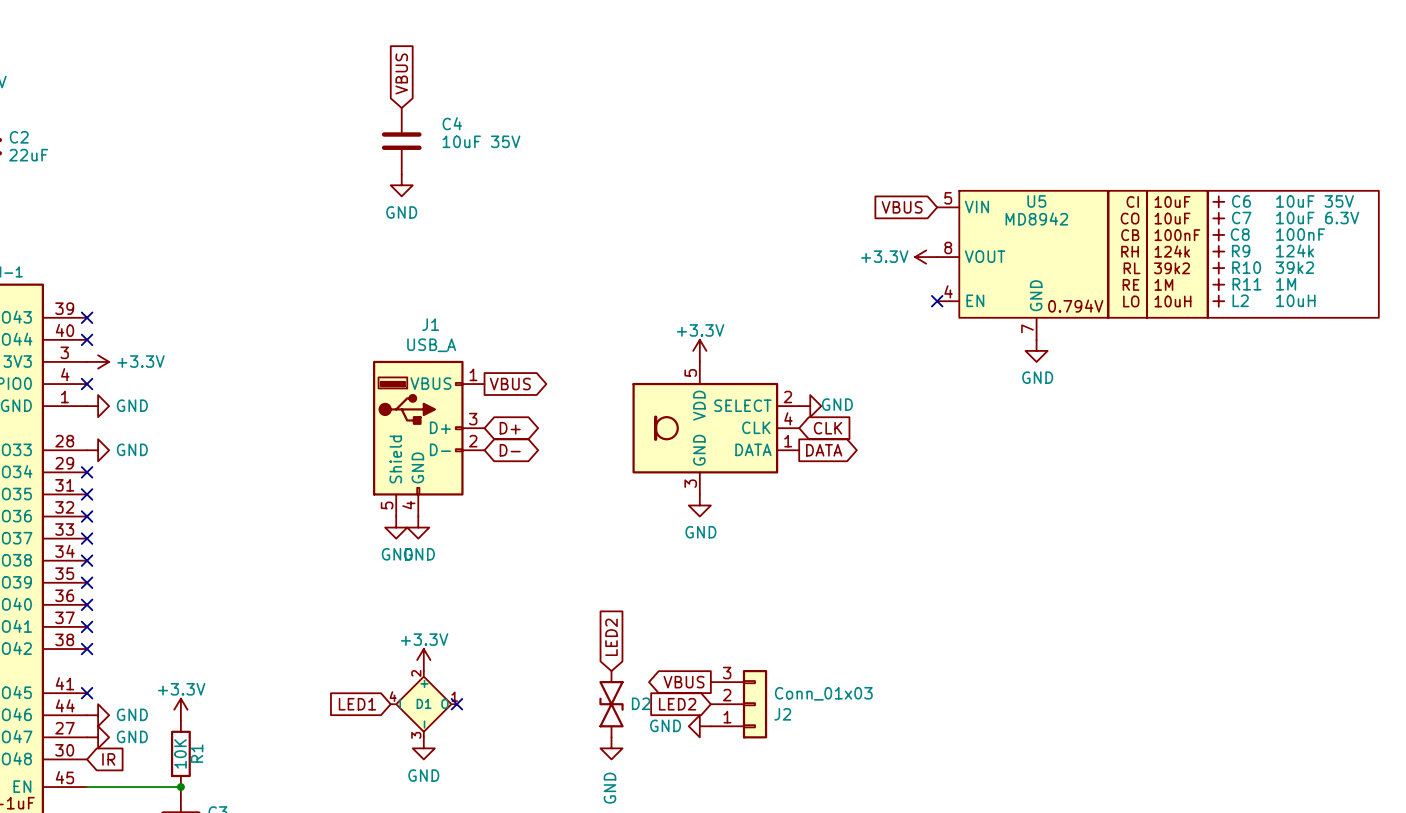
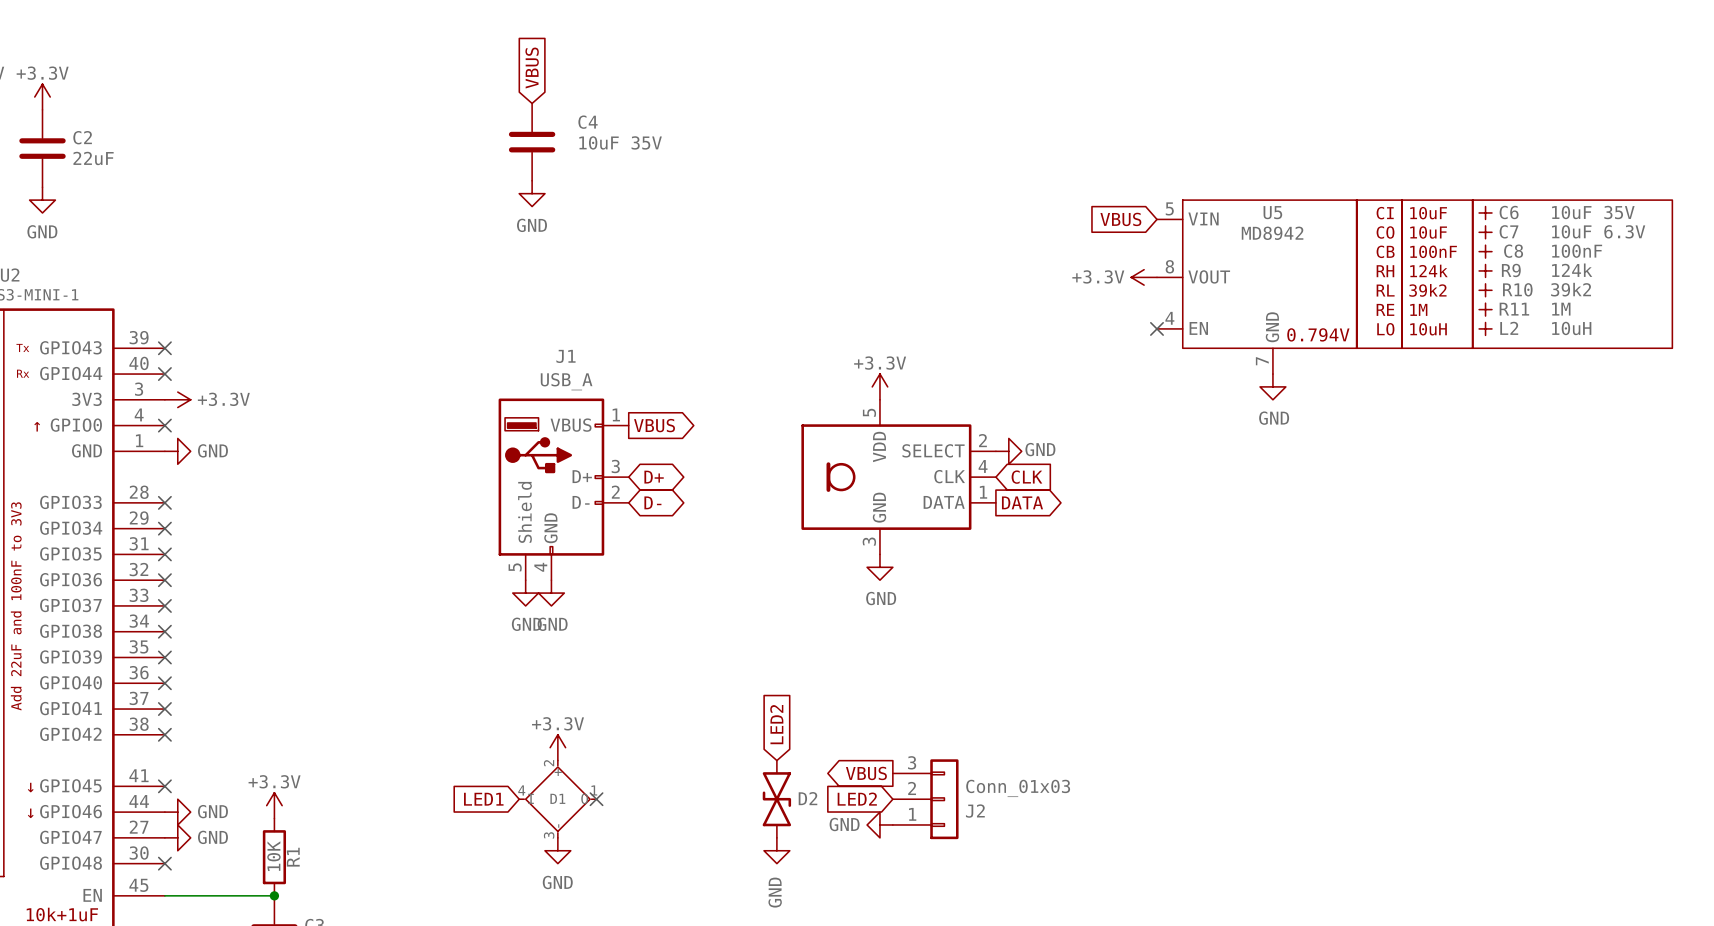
no-connect mark: none -> (164, 502)
power symbol: GND (98, 450) -> none
no-connect mark: none -> (164, 863)
global label: IR (108, 759) -> none

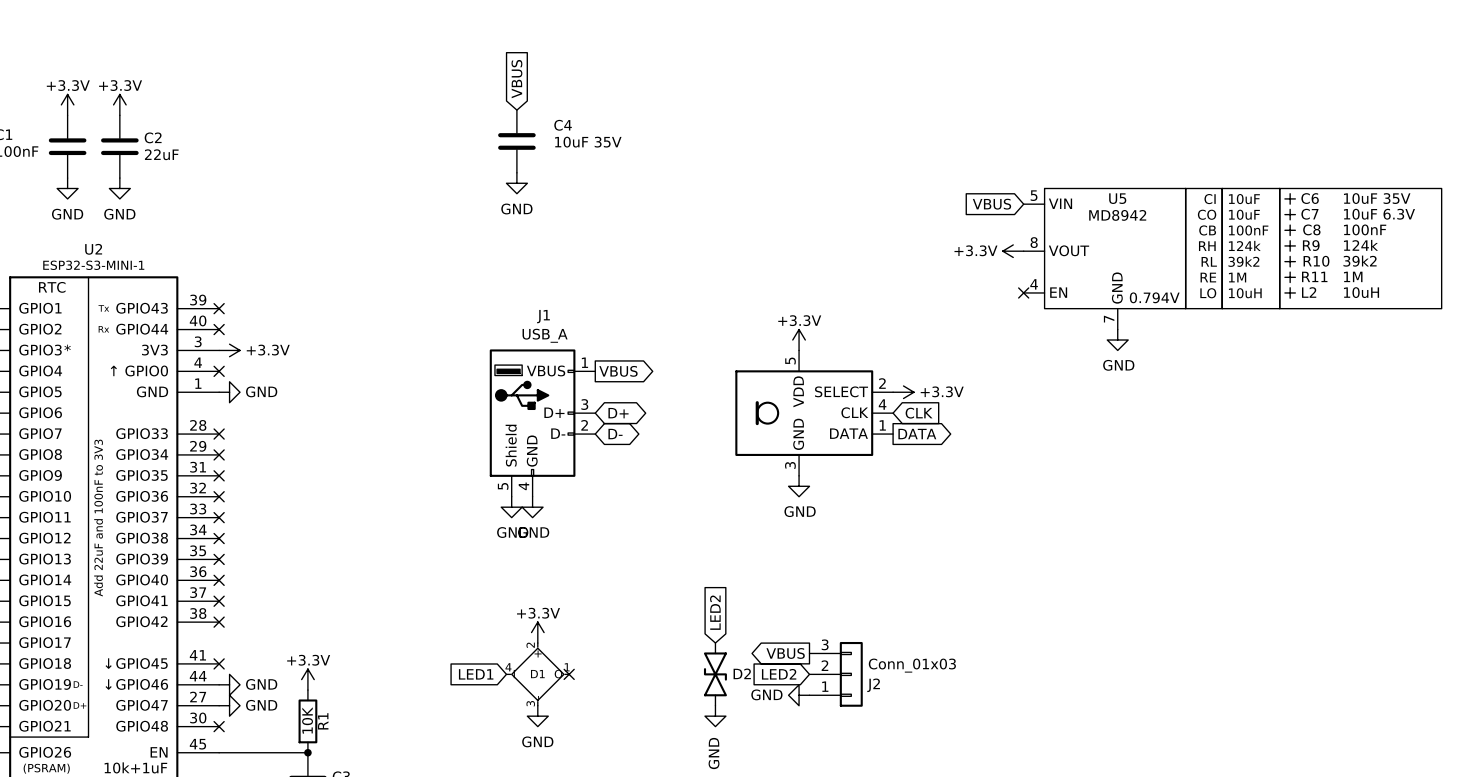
power symbol: GND (1008, 451) -> +3.3V (903, 392)

